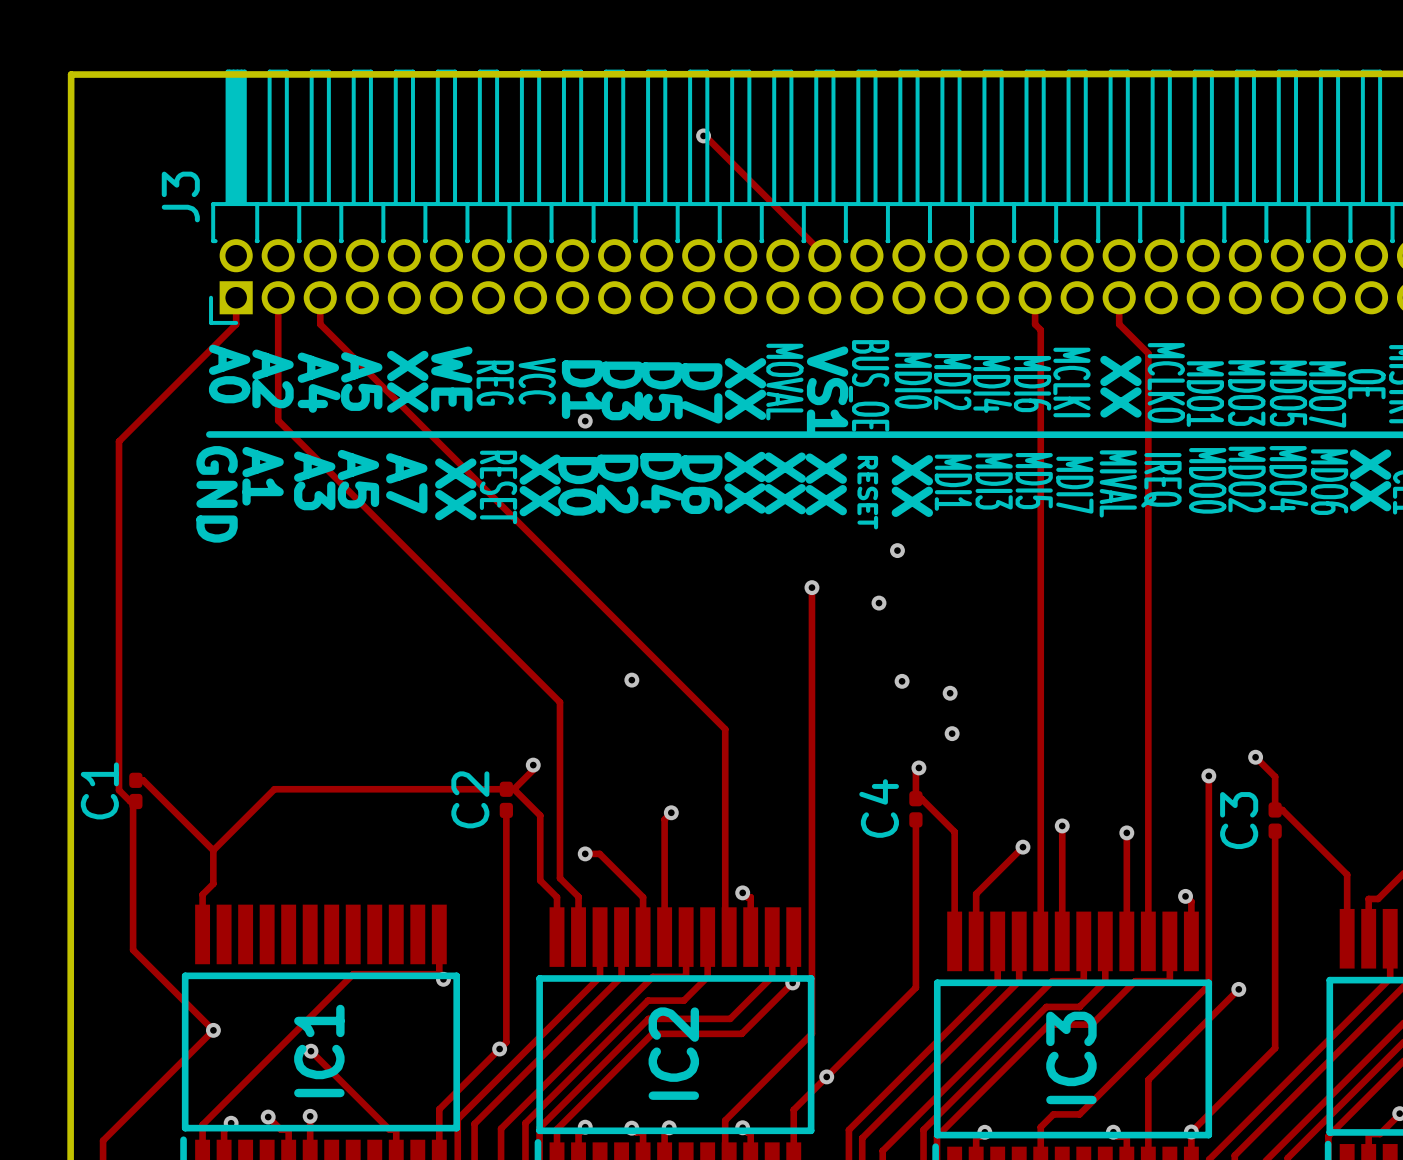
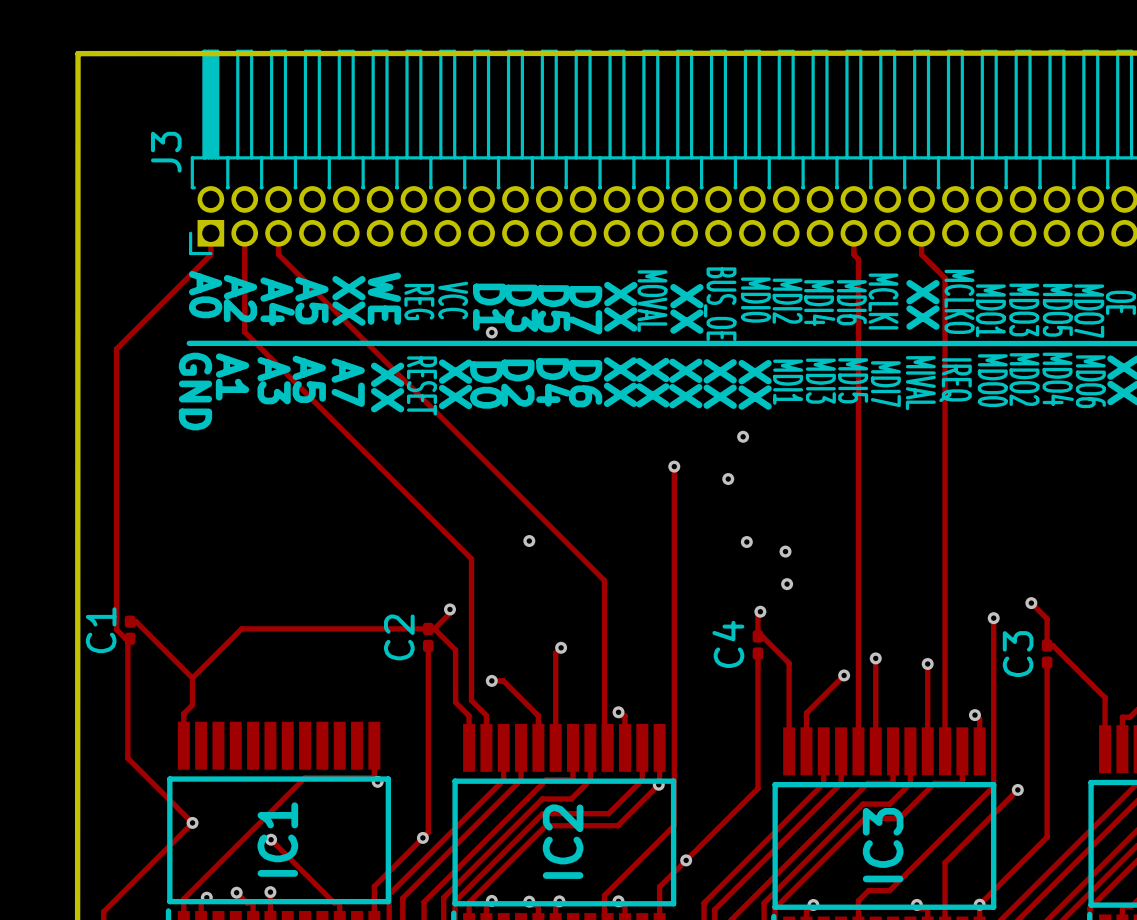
track: (703, 135) (824, 255) -> none
via: (703, 135) -> none
text: VS1 (827, 391) -> XX (686, 308)
text: RESET (867, 492) -> XX (720, 384)

